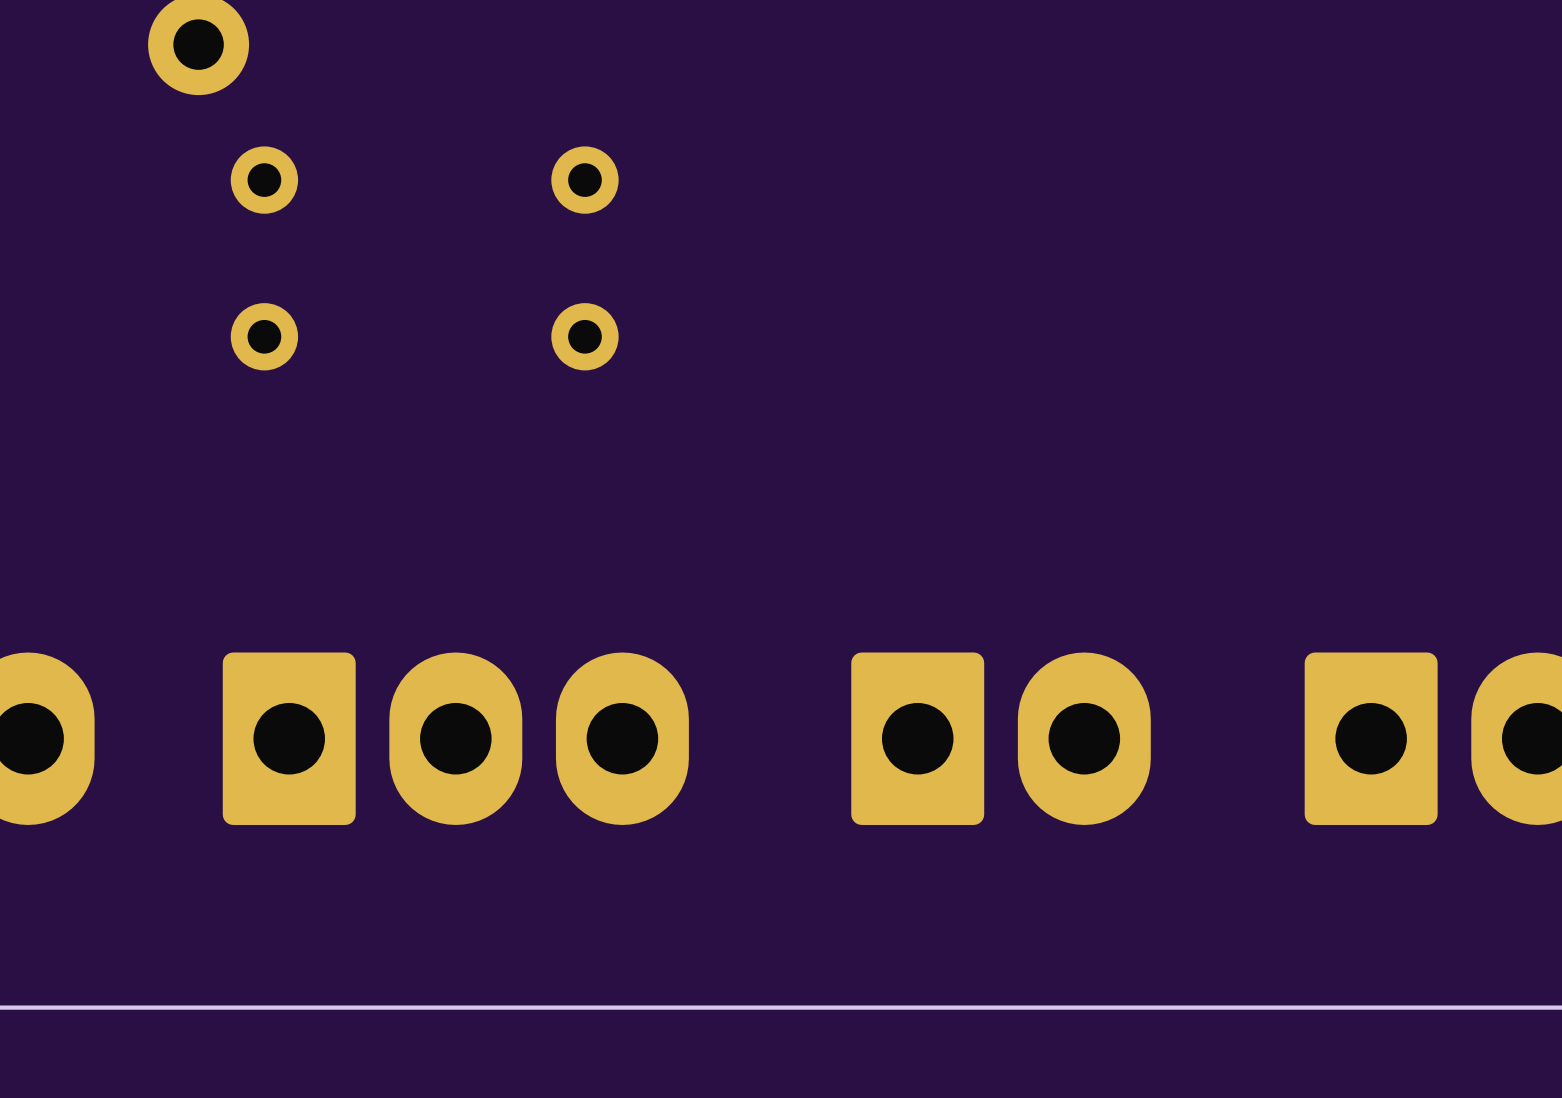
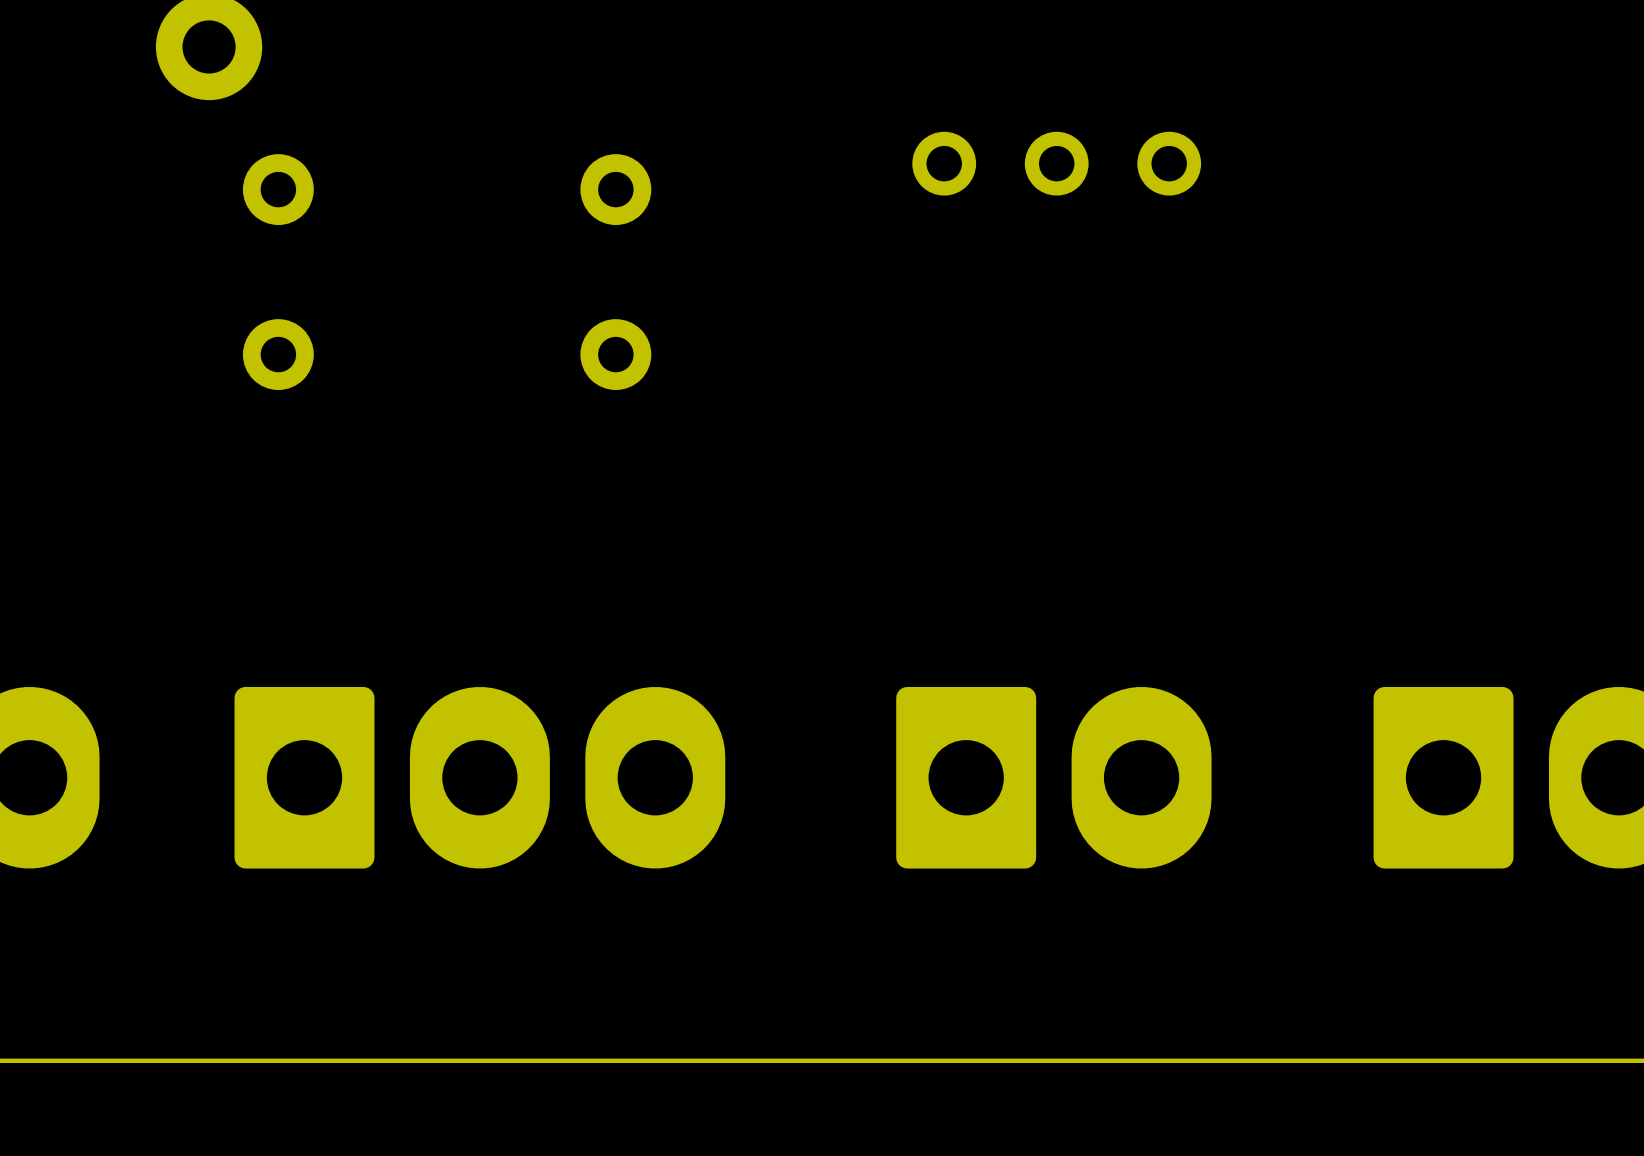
part: none -> (1056, 163)

